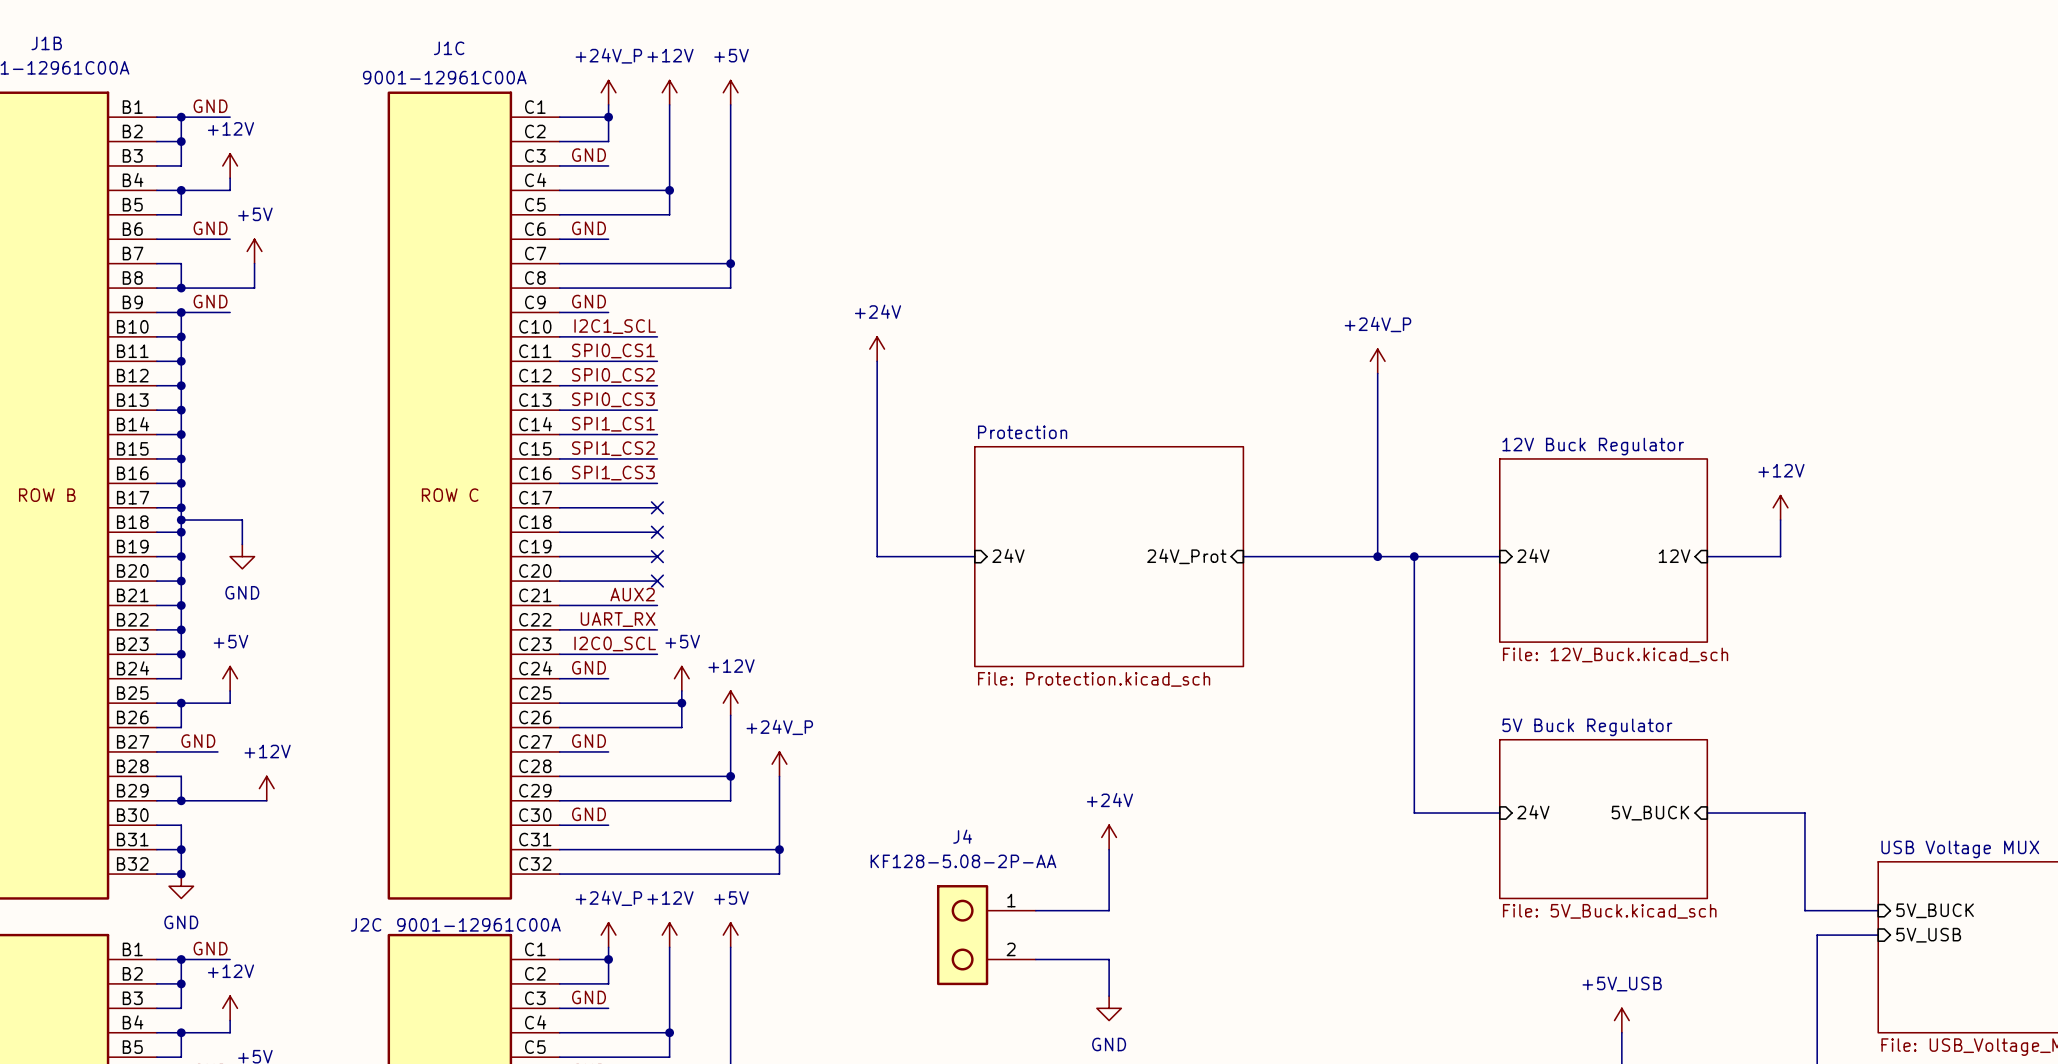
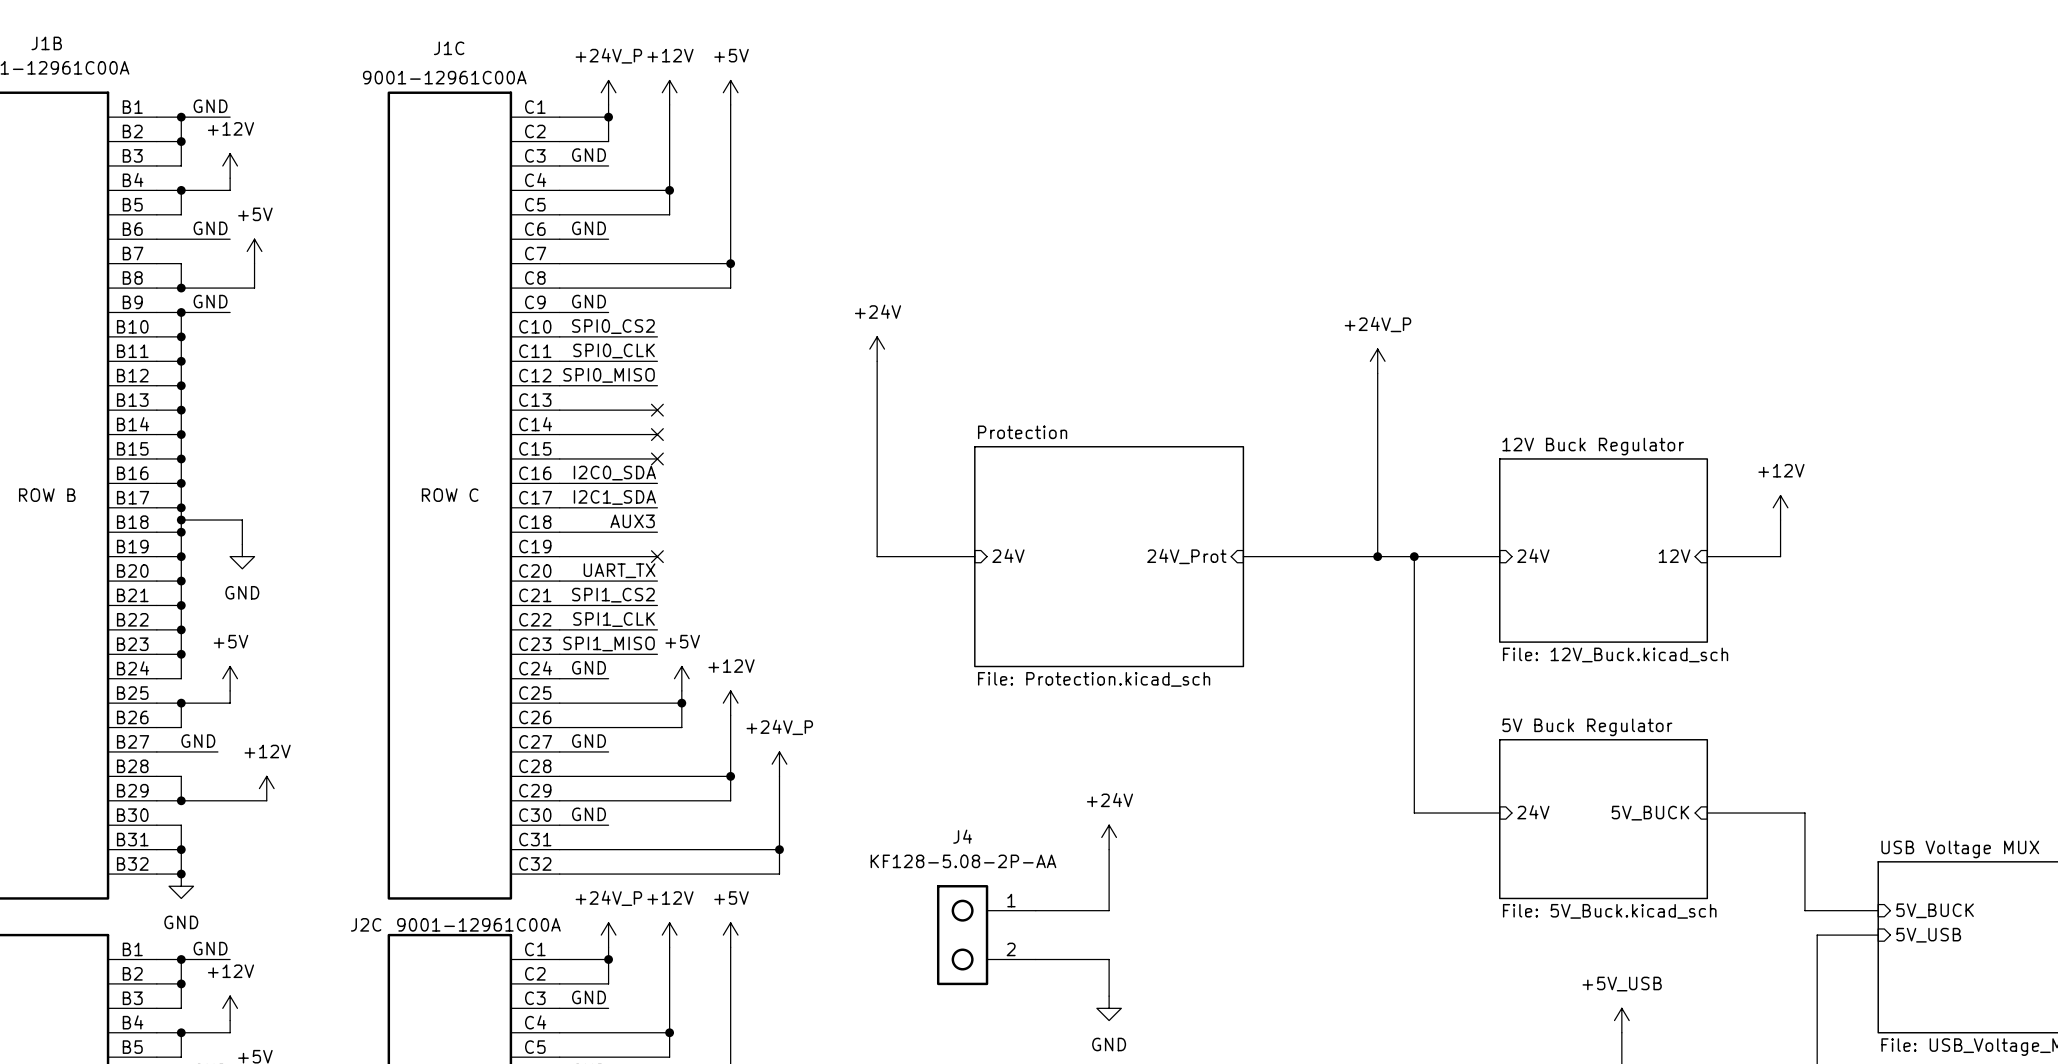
label: I2C1_SCL (615, 326) -> SPI0_CS2 (613, 326)
label: SPI0_CS1 (613, 350) -> SPI0_CLK (614, 350)
label: SPI0_CS2 (613, 375) -> SPI0_MISO (609, 375)
label: SPI0_CS3 (613, 399) -> none
no-connect mark: none -> (657, 410)
label: SPI1_CS1 (613, 424) -> none
no-connect mark: none -> (657, 434)
label: SPI1_CS2 (613, 448) -> none
no-connect mark: none -> (657, 458)
label: SPI1_CS3 (613, 473) -> I2C0_SDA (614, 473)
label: none -> I2C1_SDA (614, 497)
no-connect mark: (657, 507) -> none
label: none -> AUX3 (632, 521)
no-connect mark: (657, 532) -> none
label: none -> UART_TX (619, 570)
no-connect mark: (657, 581) -> none
label: AUX2 (632, 594) -> SPI1_CS2 (613, 595)
label: UART_RX (618, 619) -> SPI1_CLK (614, 619)
label: I2C0_SCL (615, 643) -> SPI1_MISO (609, 643)

